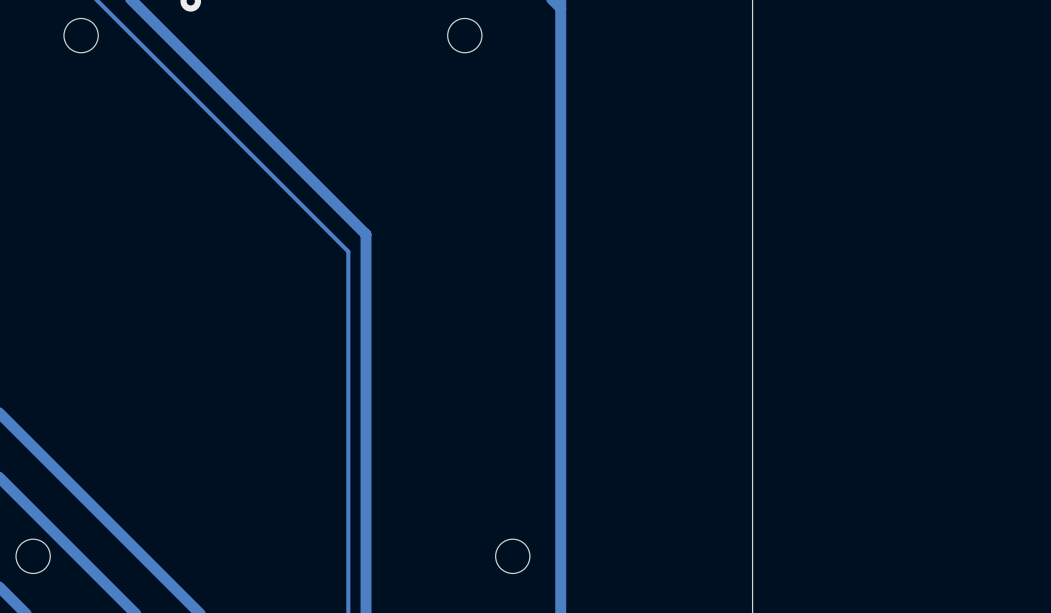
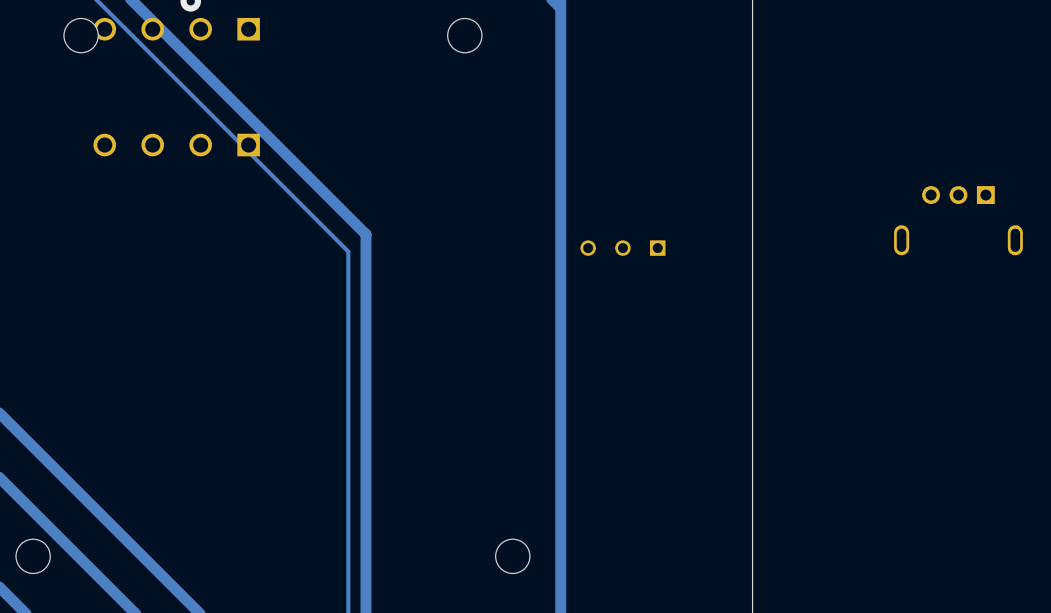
part: none -> (176, 29)
part: none -> (176, 145)
part: none -> (958, 220)
part: none -> (622, 248)

